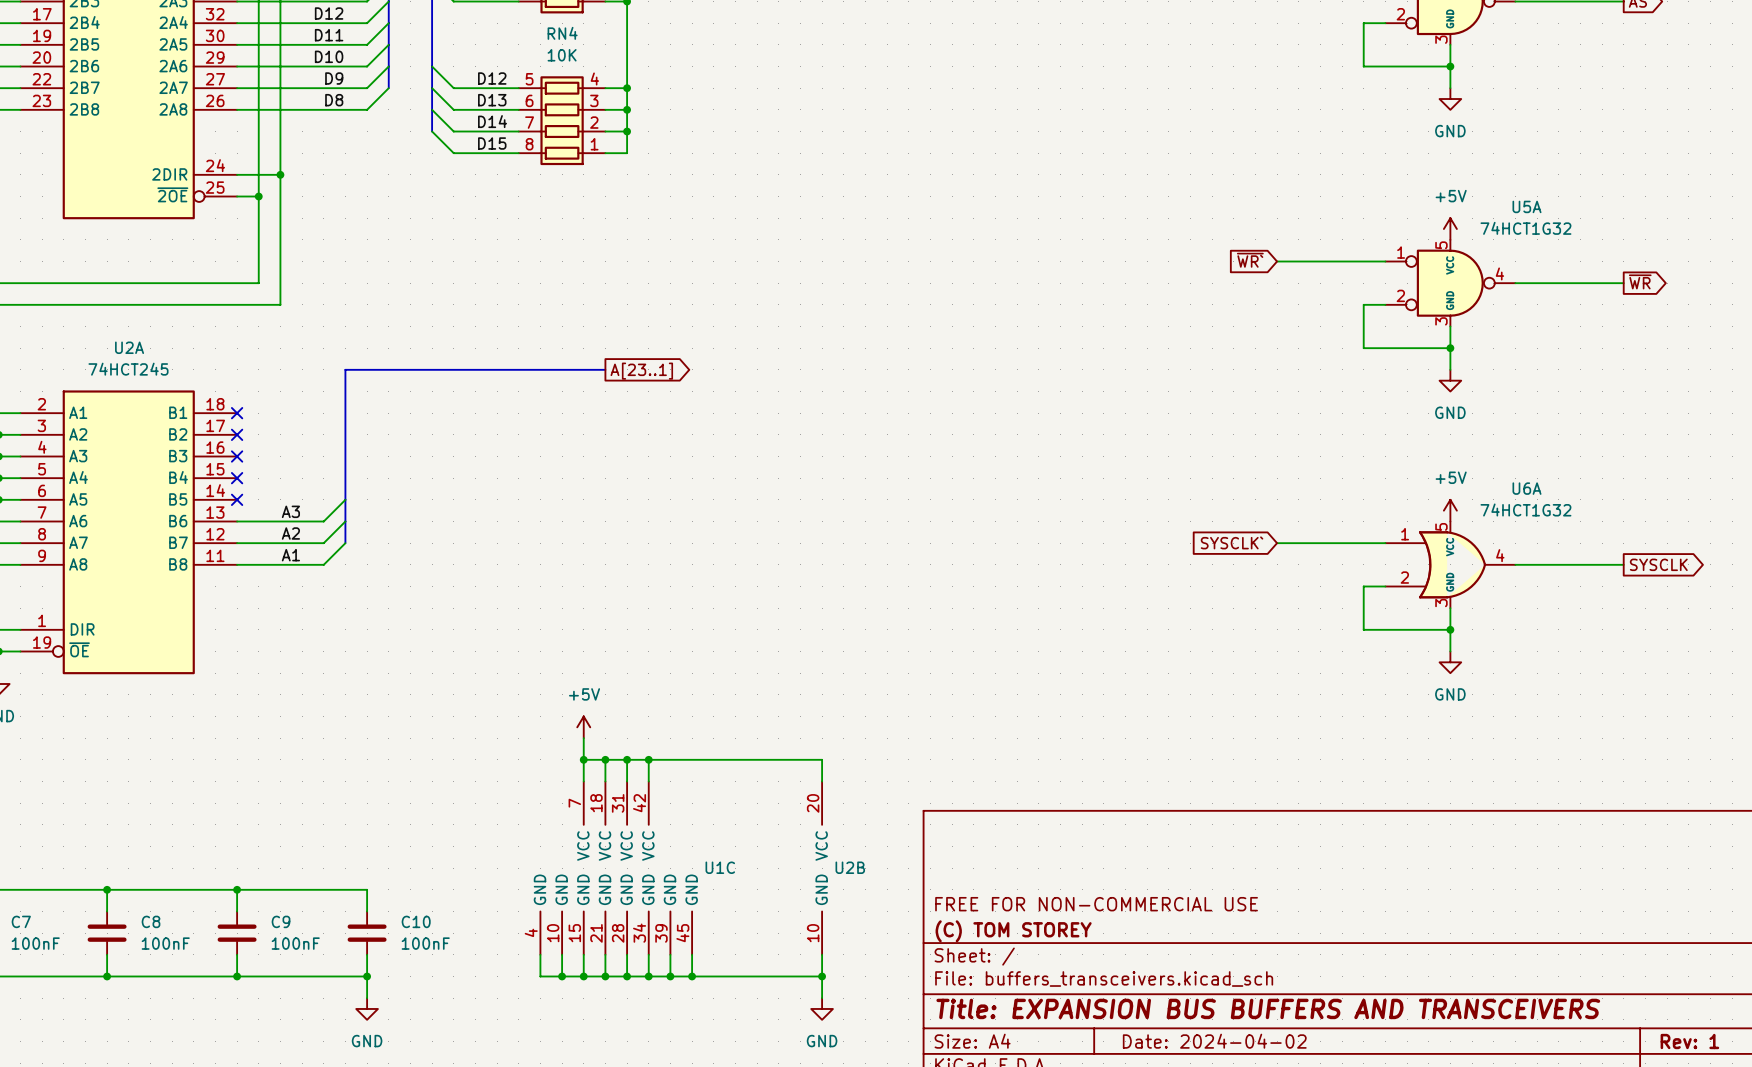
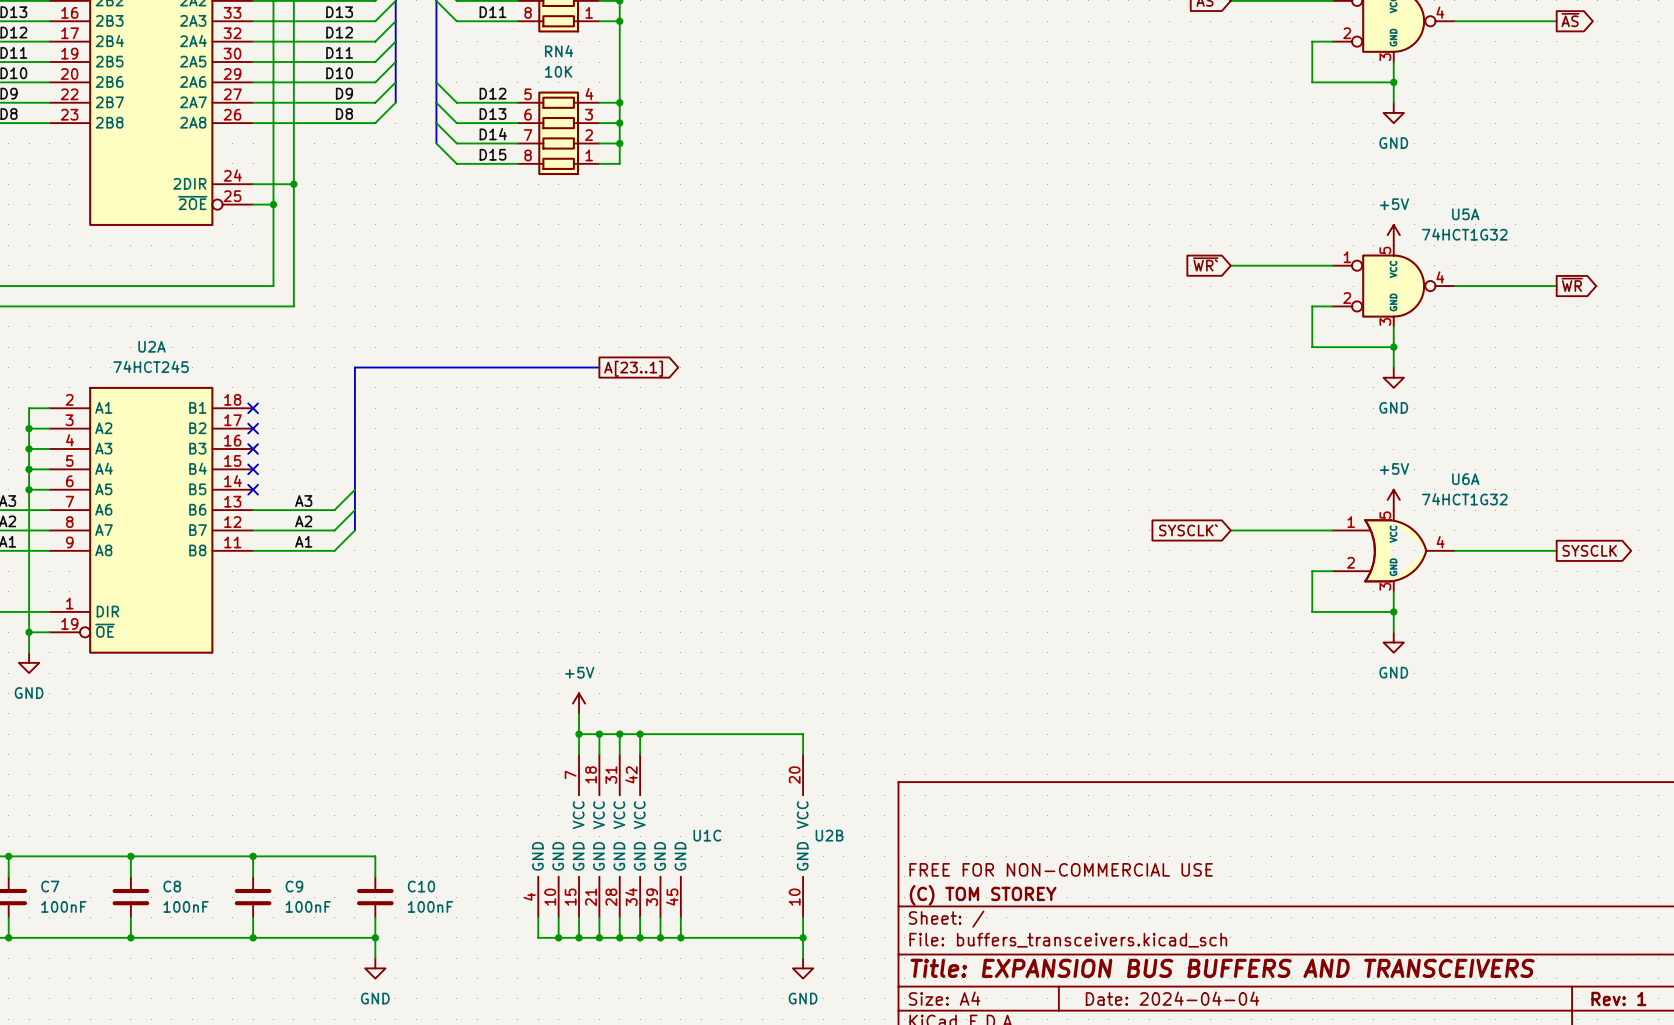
title block: Date: 2024-04-02 (1214, 1041) -> Date: 2024-04-04 (1172, 998)

